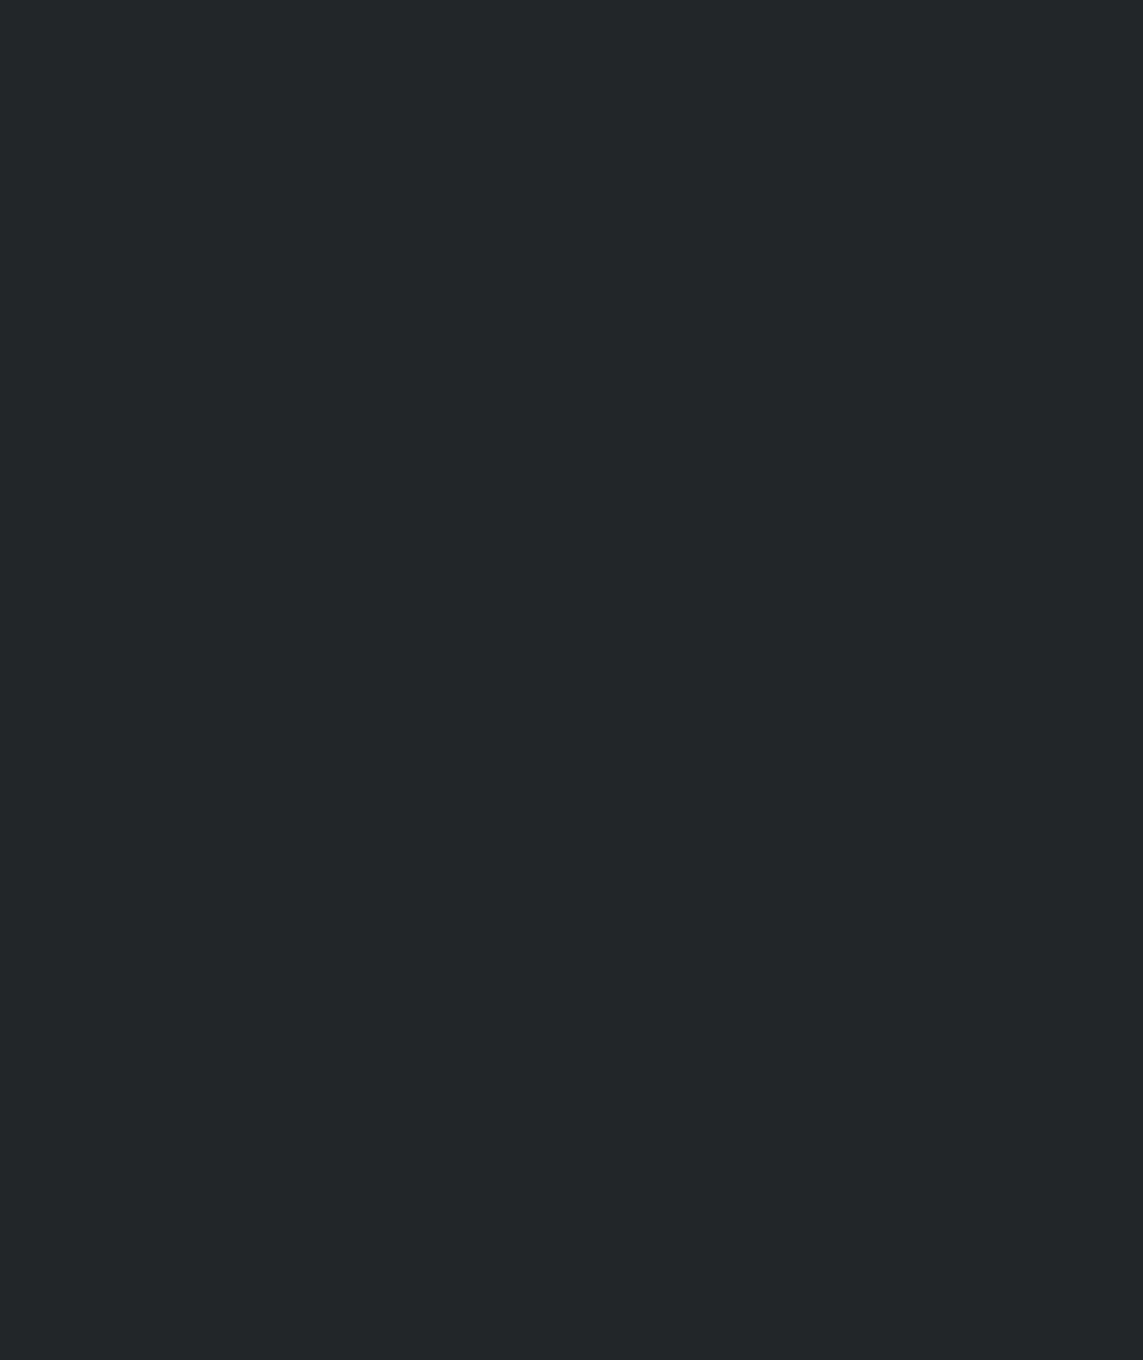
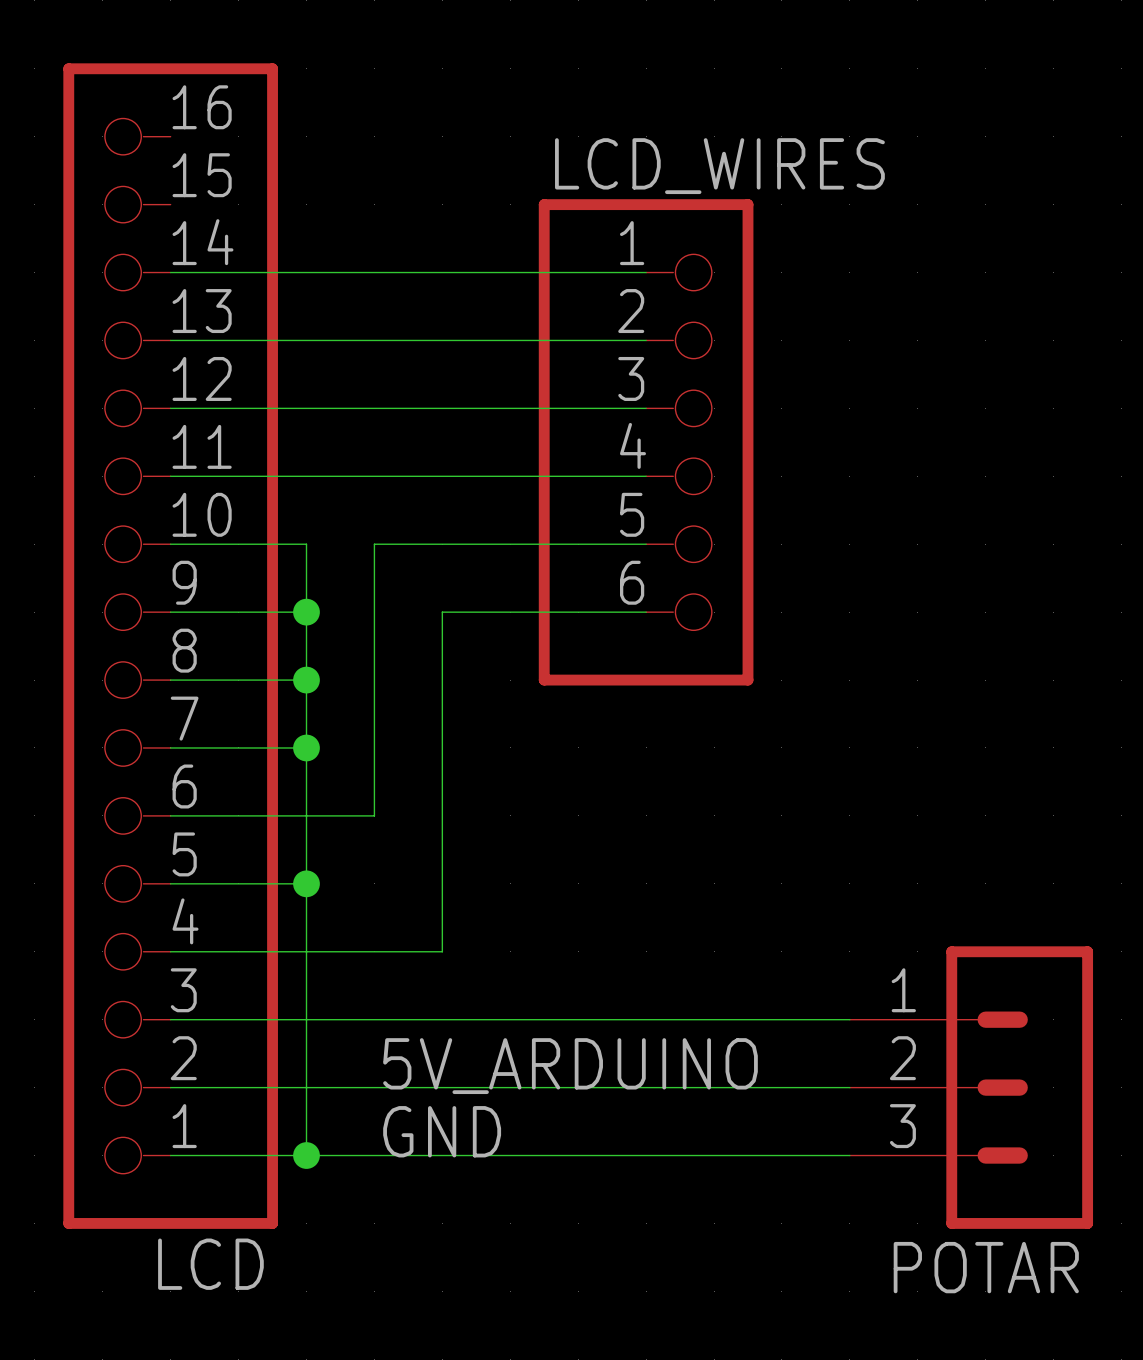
wire: none -> (170, 272) (646, 272)
wire: none -> (170, 340) (646, 340)
wire: none -> (170, 408) (646, 408)
LCD_WIRES: none -> (646, 442)
wire: none -> (170, 476) (646, 476)
wire: none -> (170, 544) (306, 544) (306, 1155)
wire: none -> (646, 544) (374, 544) (374, 815) (170, 815)
wire: none -> (170, 612) (306, 612)
junction: none -> (306, 612)
wire: none -> (646, 612) (442, 612) (442, 951) (170, 951)
LCD: none -> (170, 646)
wire: none -> (170, 680) (306, 680)
junction: none -> (306, 680)
wire: none -> (170, 747) (306, 747)
junction: none -> (306, 747)
wire: none -> (170, 883) (306, 883)
junction: none -> (306, 883)
wire: none -> (170, 1019) (849, 1019)
label: none -> 5V_ARDUINO (570, 1066)
wire: none -> (170, 1087) (849, 1087)
POTAR: none -> (971, 1087)
label: none -> GND (442, 1131)
wire: none -> (170, 1155) (849, 1155)
junction: none -> (306, 1155)

